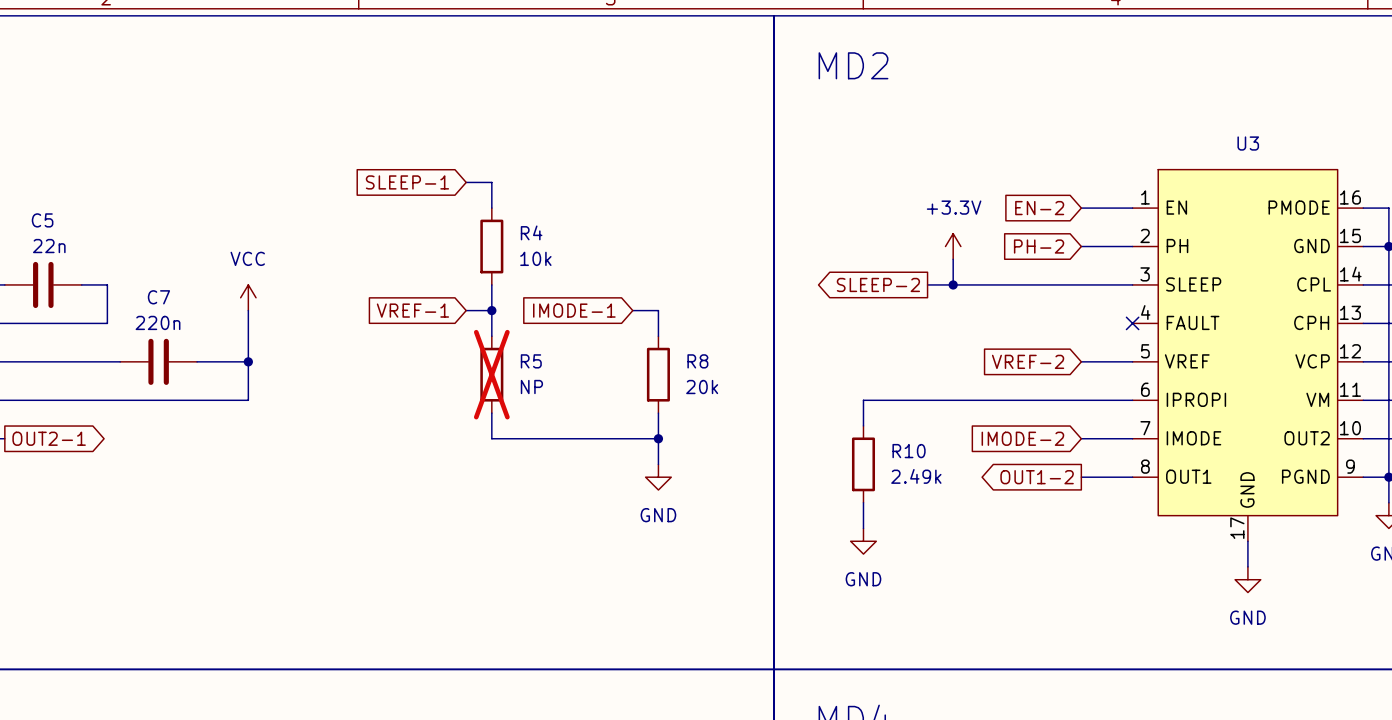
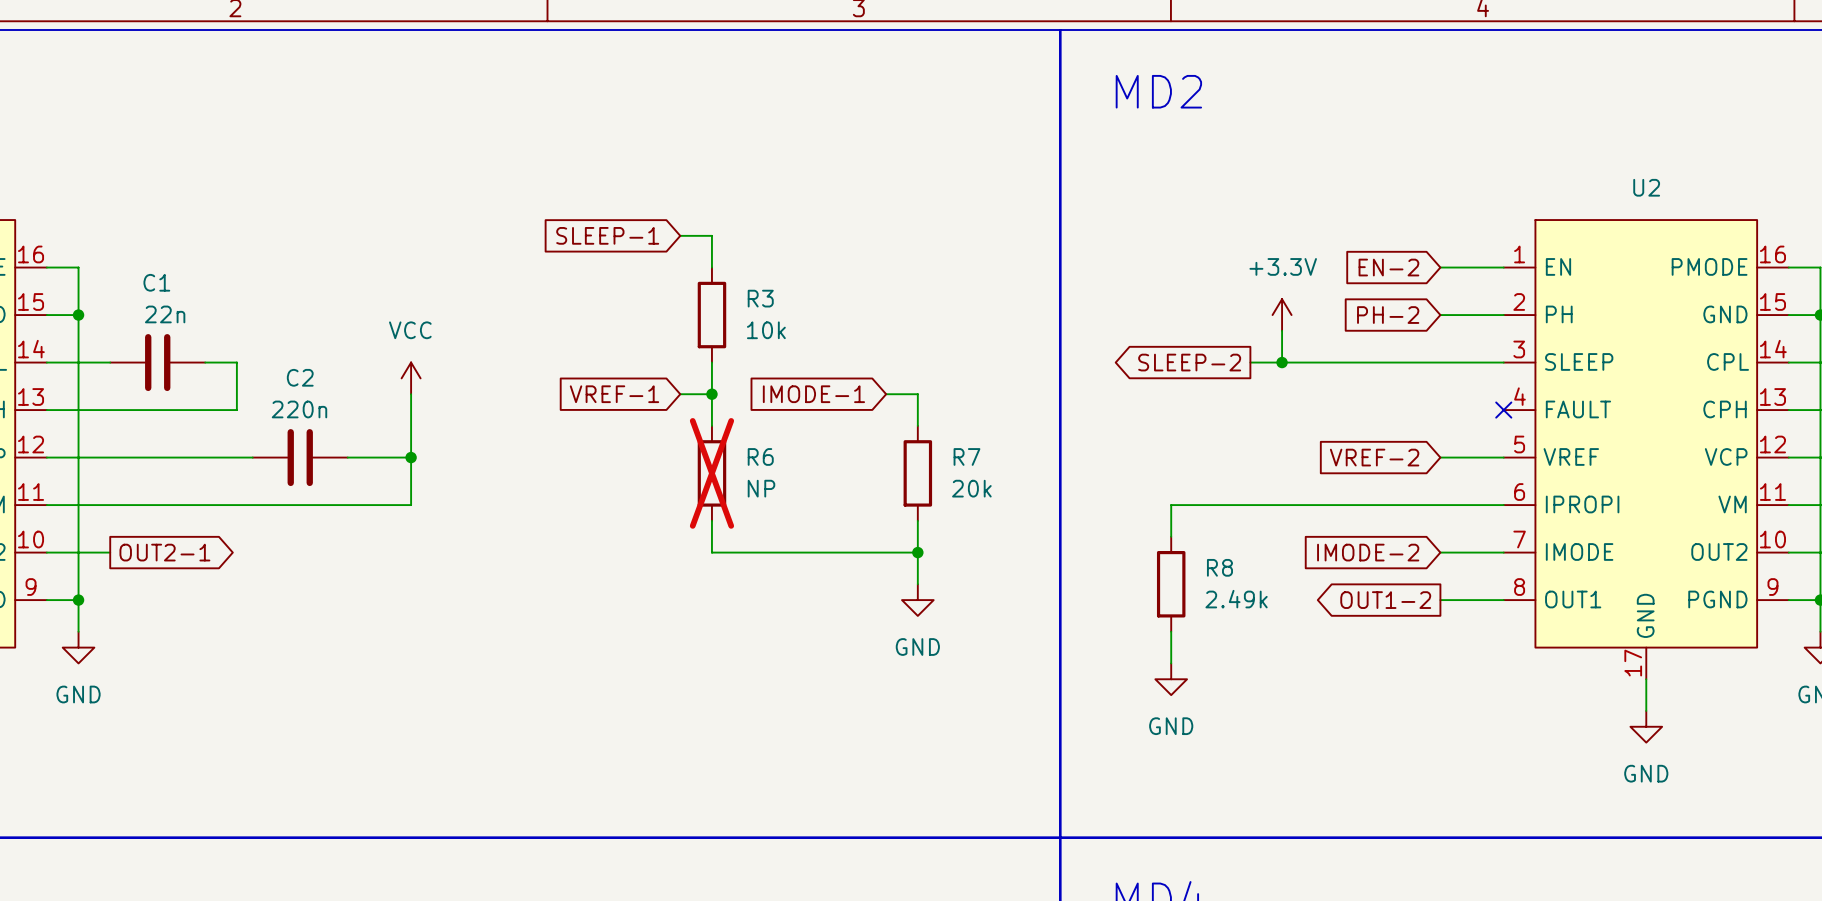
U3 name: U3 (1248, 143) -> U2 (1646, 187)
C5 name: C5 (42, 220) -> C1 (156, 282)
R4 name: R4 (531, 232) -> R3 (760, 298)
C7 name: C7 (158, 297) -> C2 (300, 377)
R5 name: R5 (531, 361) -> R6 (760, 456)
R8 name: R8 (697, 361) -> R7 (966, 456)
R10 name: R10 (909, 451) -> R8 (1219, 567)

